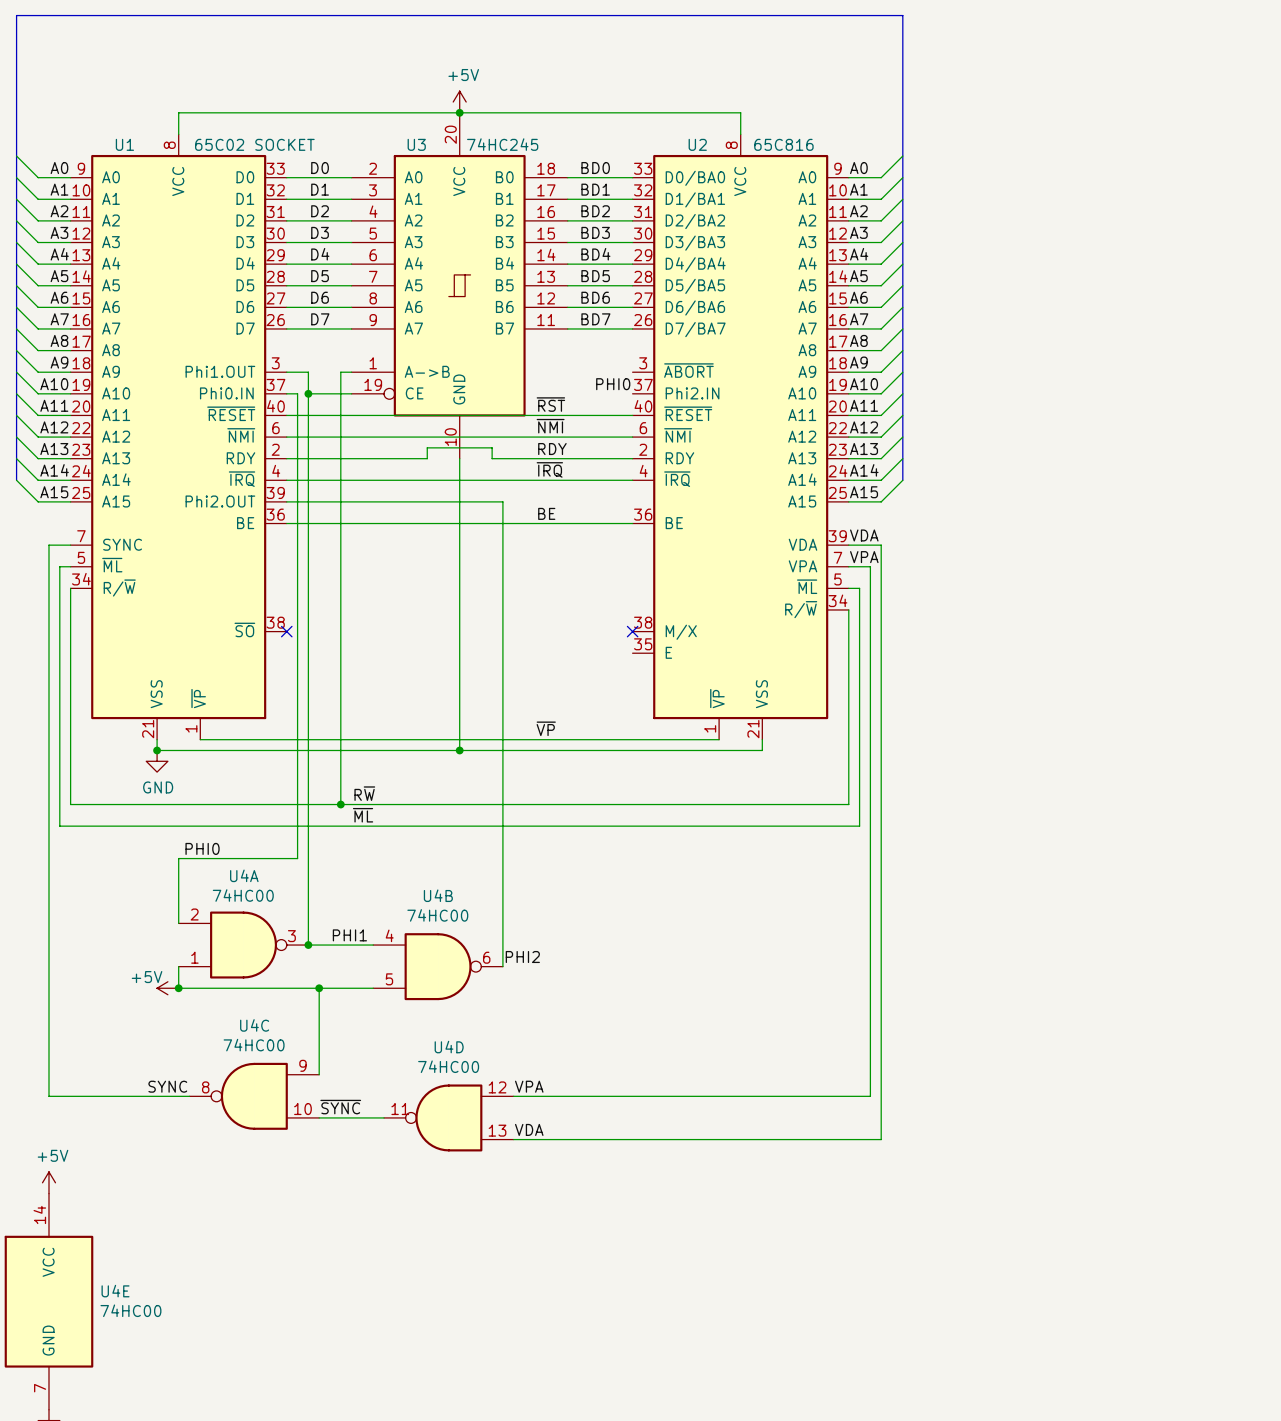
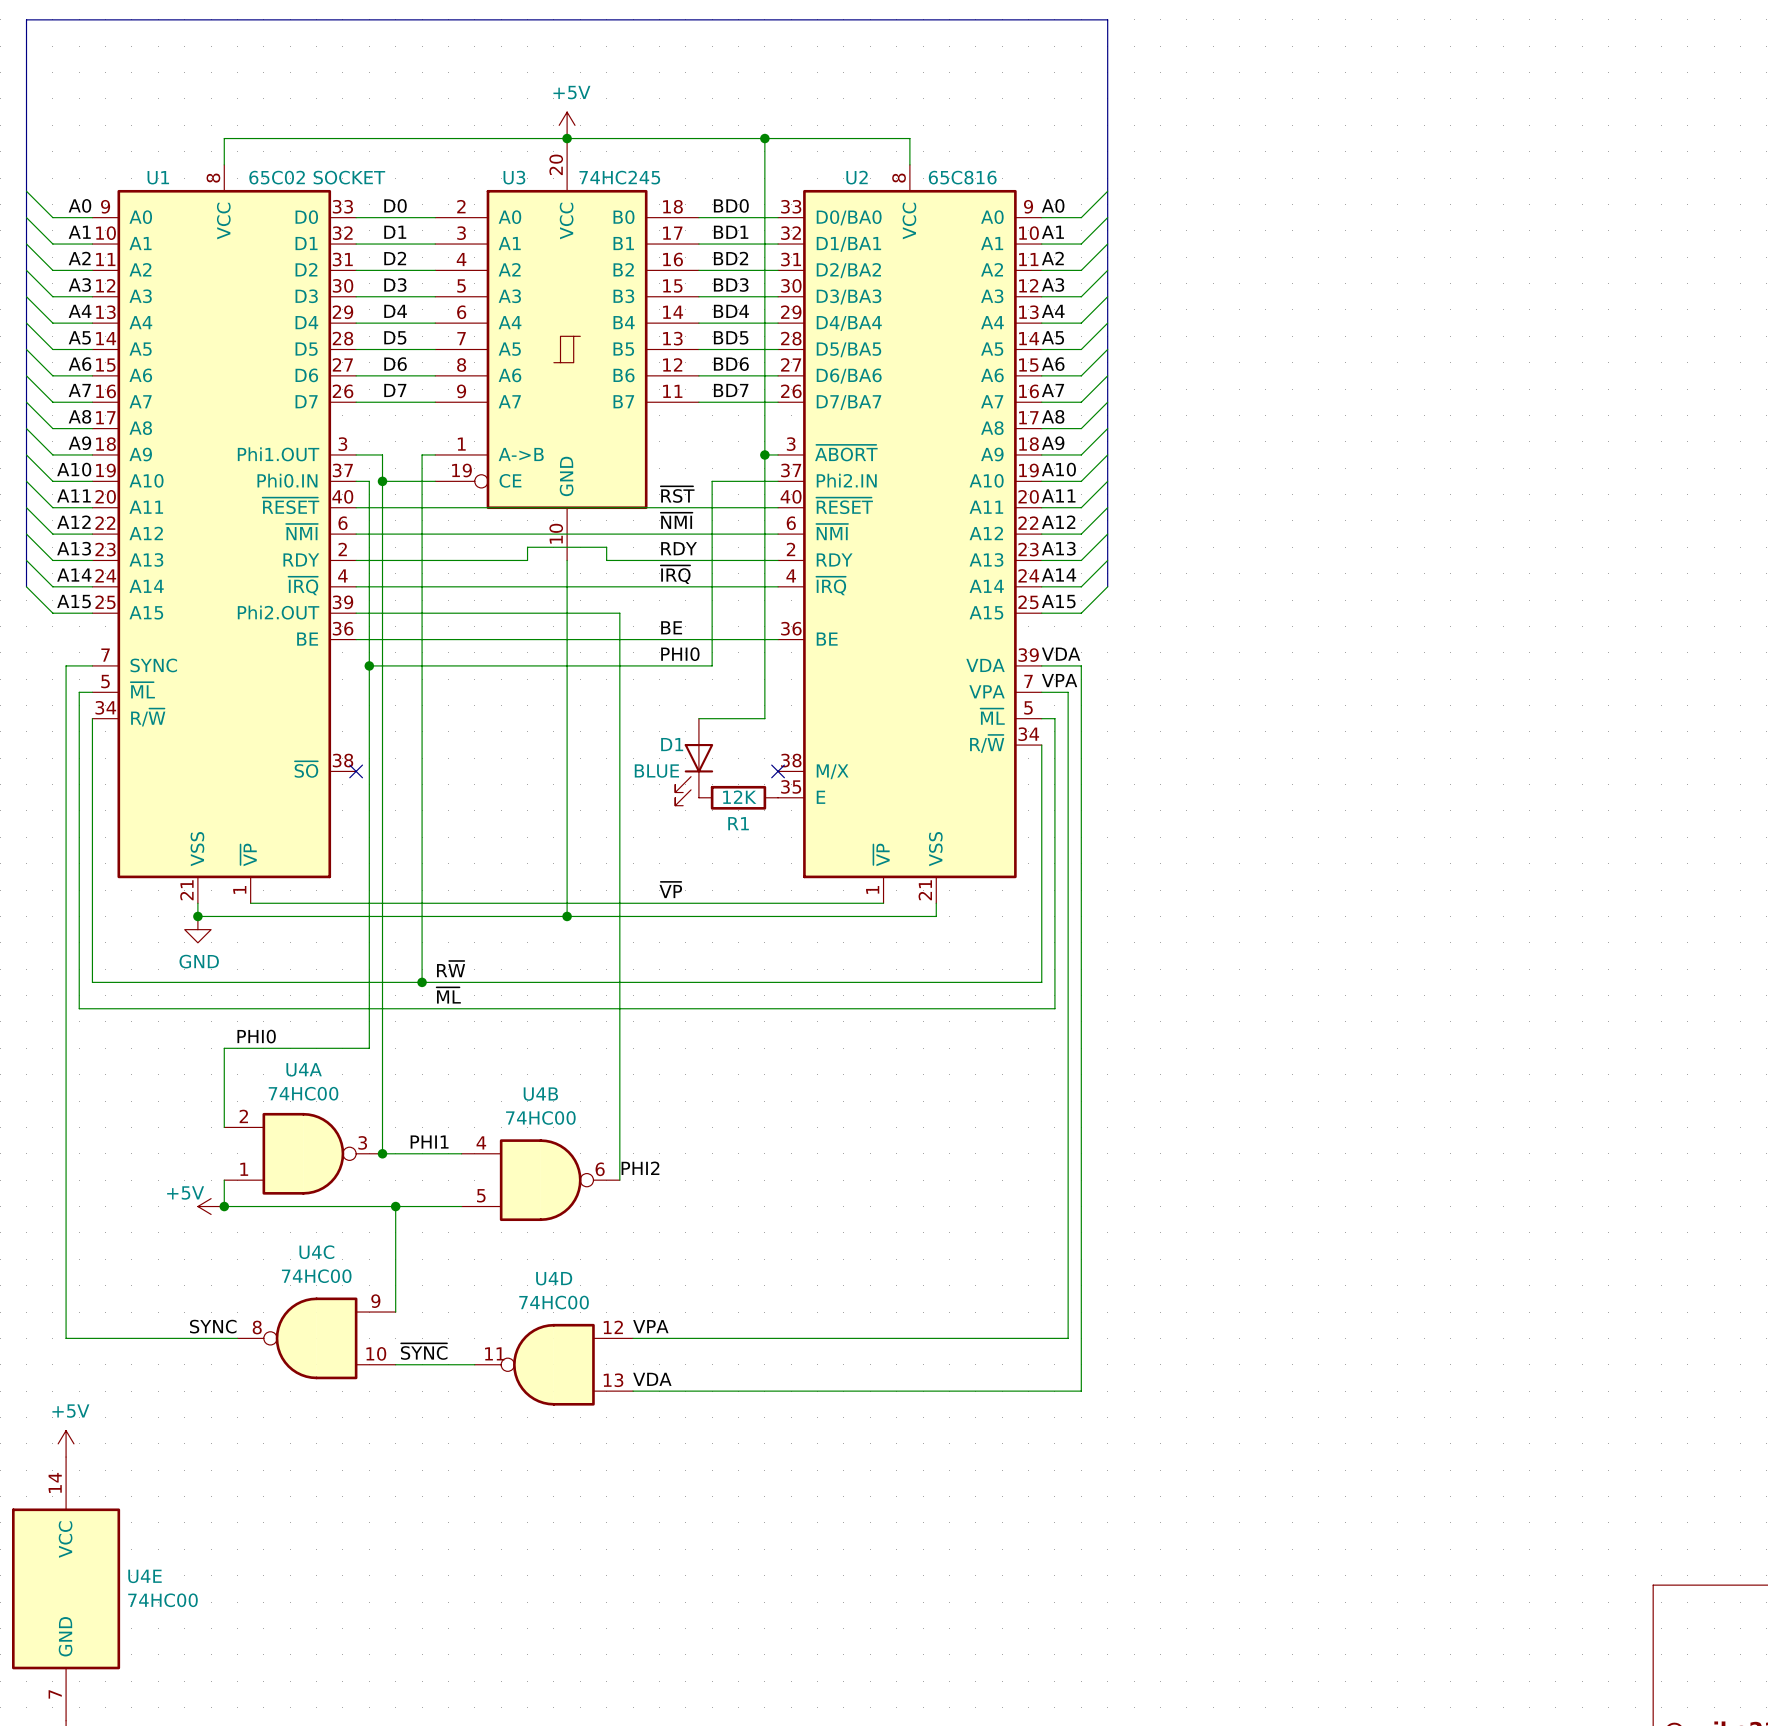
wire: none -> (764, 138) (764, 718) (698, 718)
junction: none -> (764, 138)
wire: none -> (764, 454) (778, 454)
junction: none -> (764, 454)
label position: PHI0 (613, 384) -> PHI0 (680, 654)
wire: none -> (778, 481) (712, 481) (712, 665) (369, 665)
junction: none -> (369, 665)
D1: none -> BLUE (694, 762)
R1: none -> 12K (738, 797)

